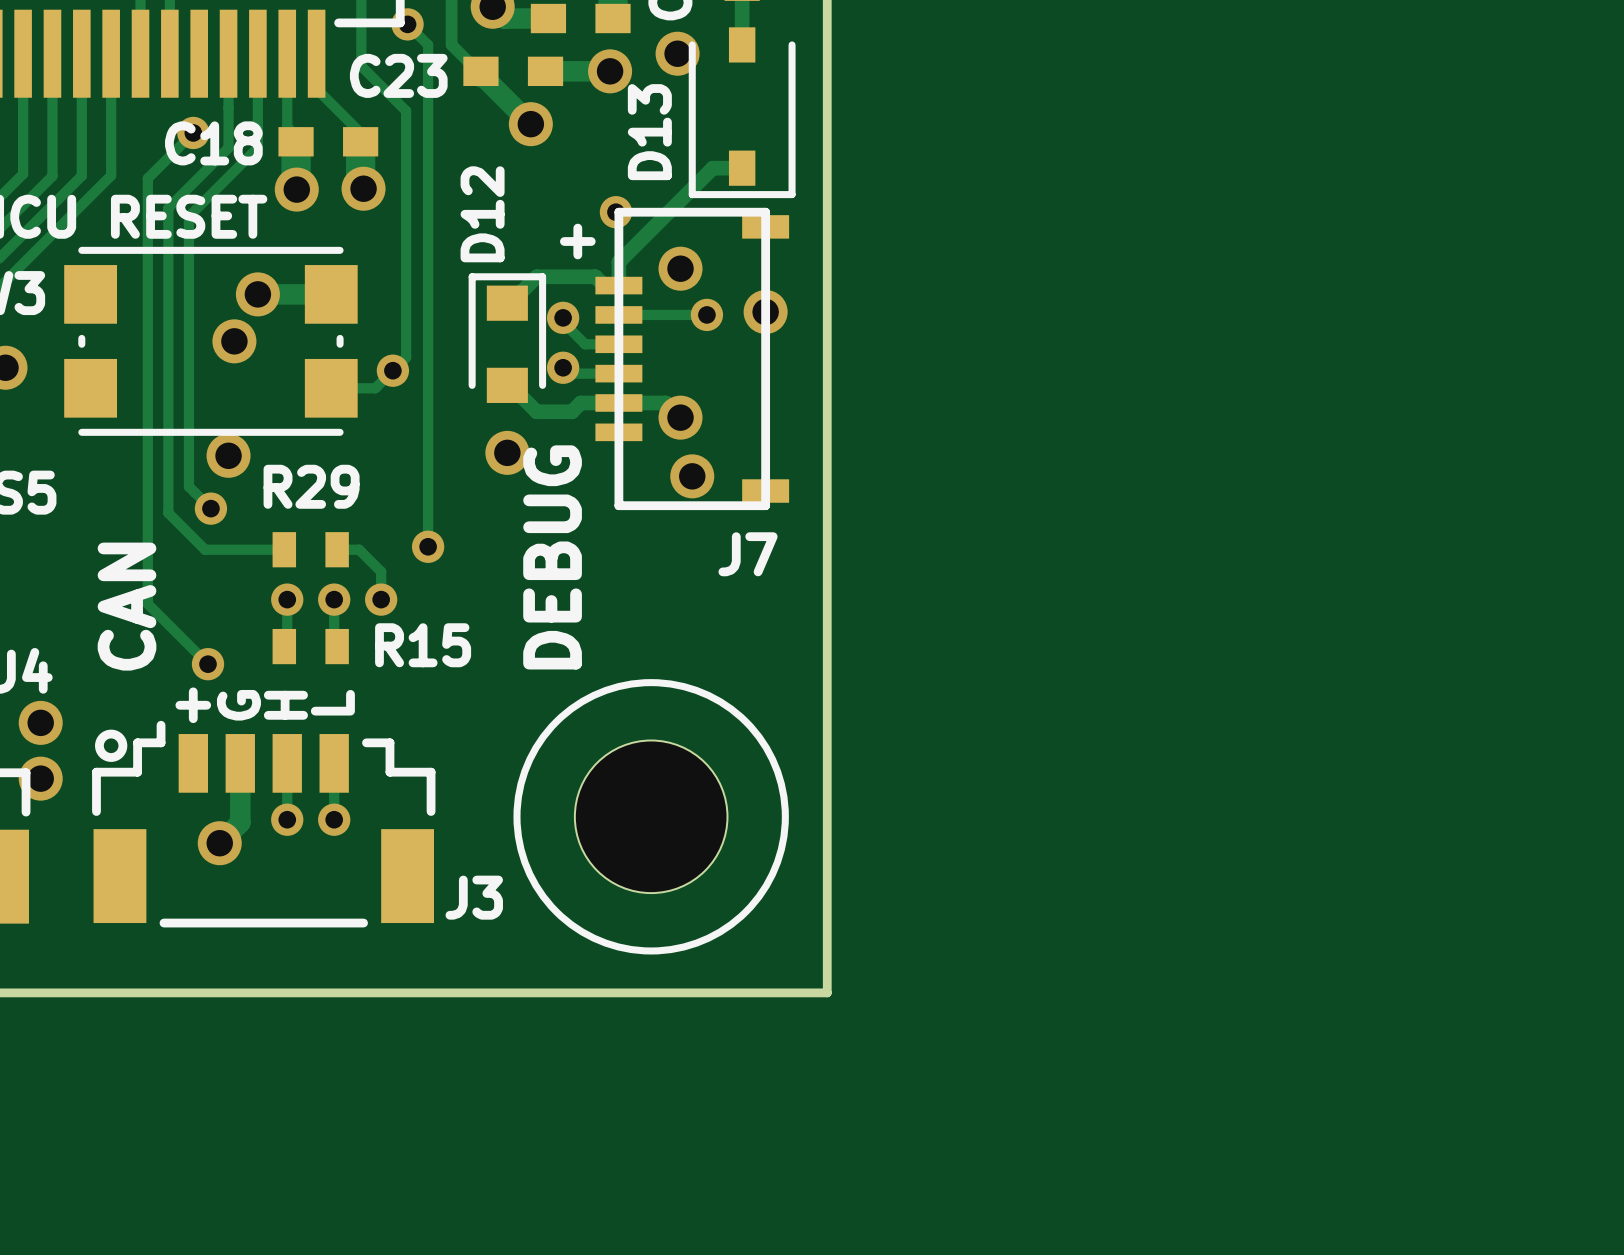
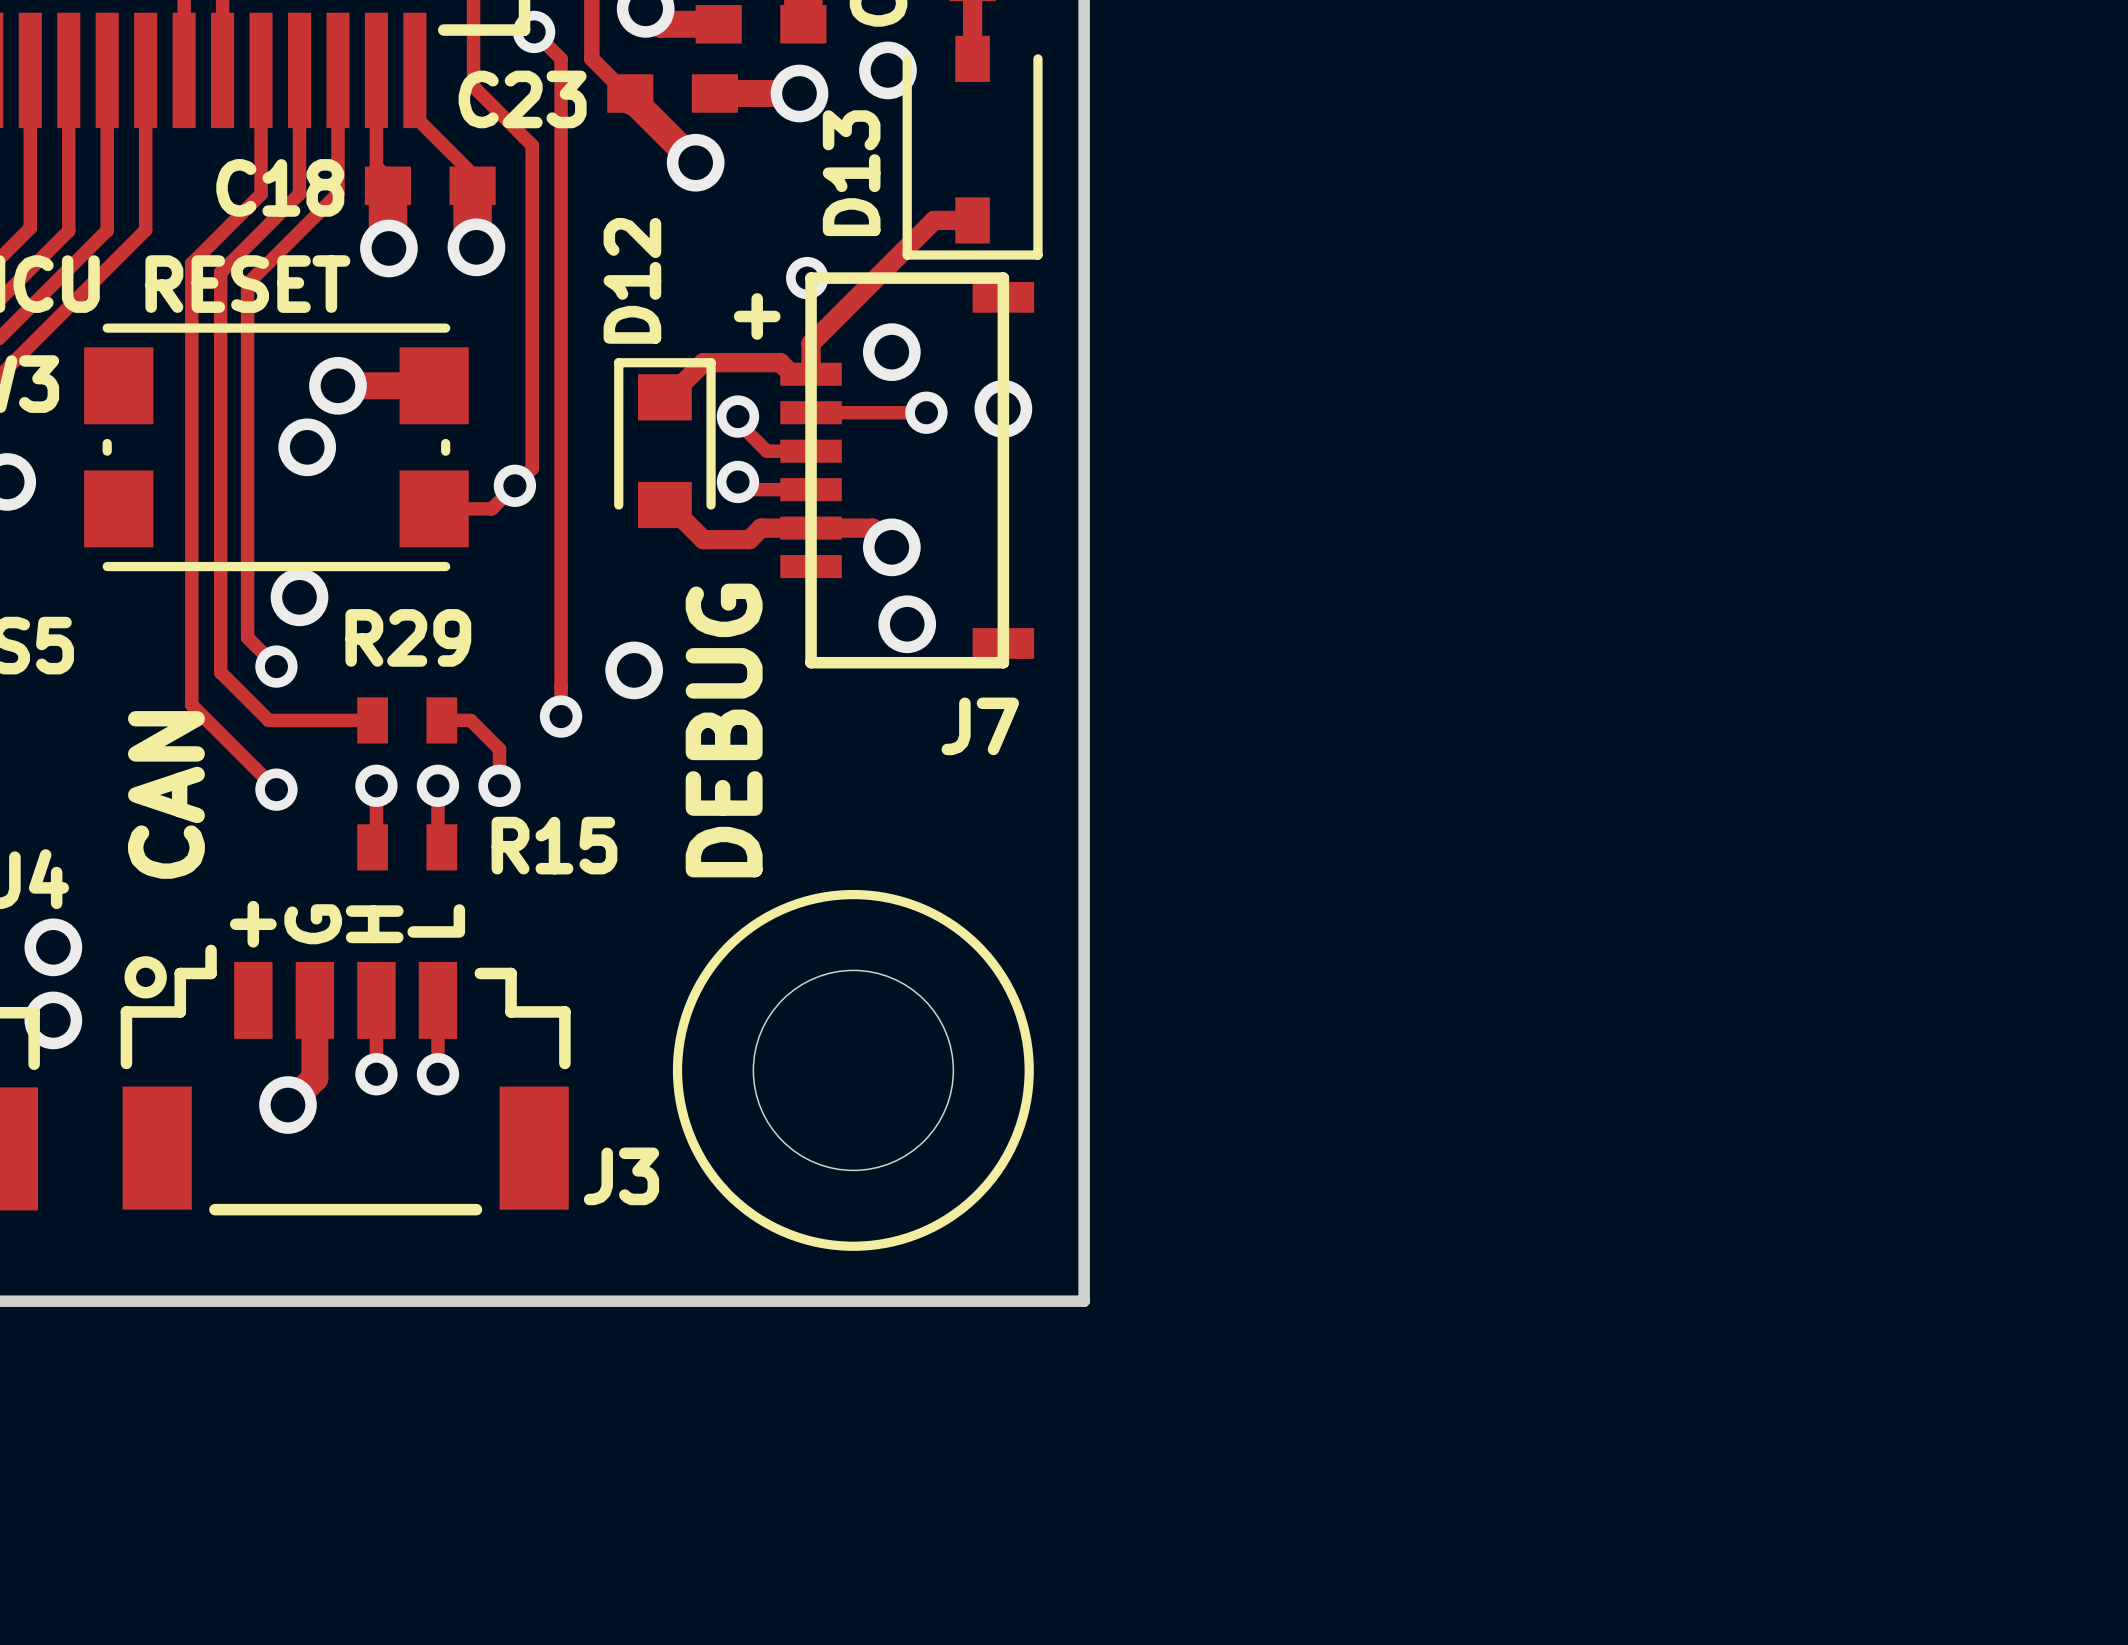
track: none -> (261, 70) (261, 194) (191, 263) (191, 705) (276, 789)
track: (193, 132) (147, 178) (147, 604) (208, 664) -> none
via: (193, 132) -> none
via position: (507, 452) -> (634, 670)
via position: (208, 664) -> (276, 789)

